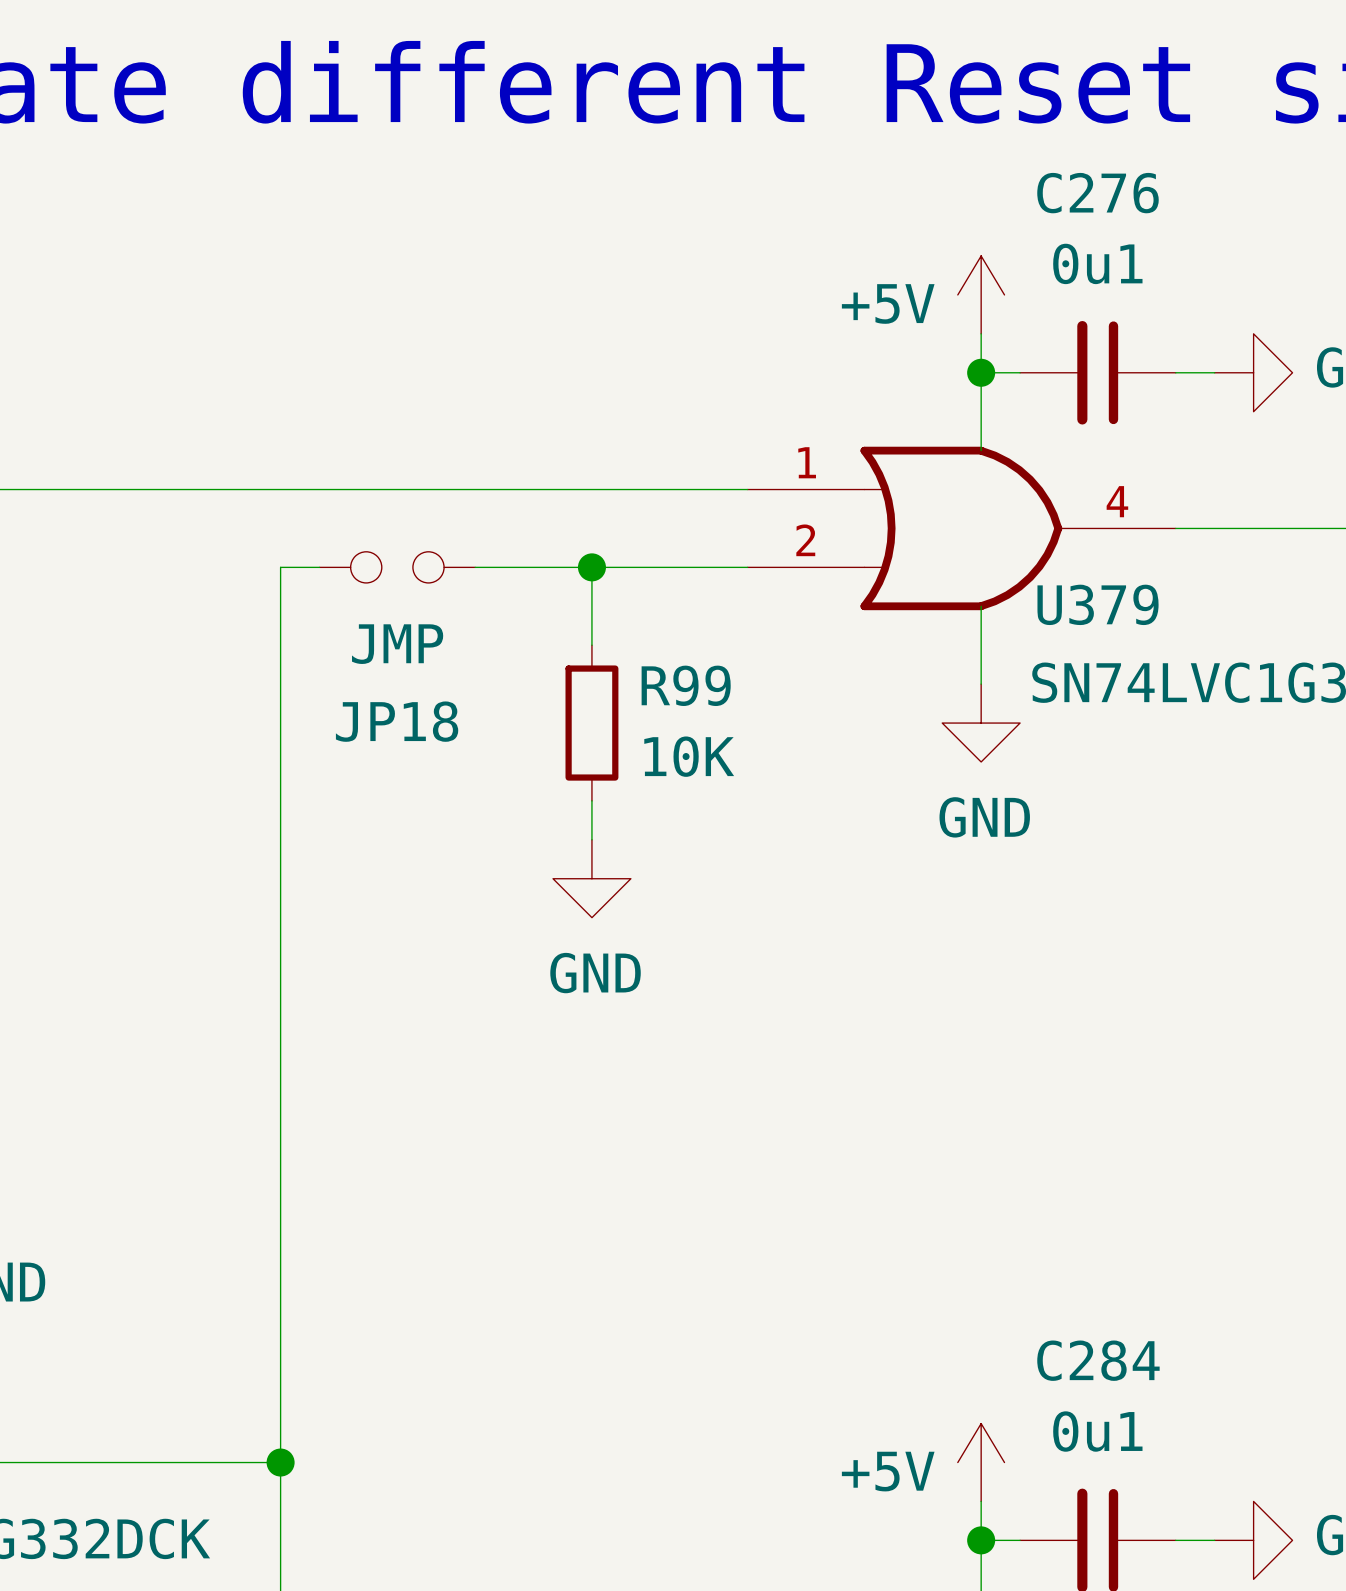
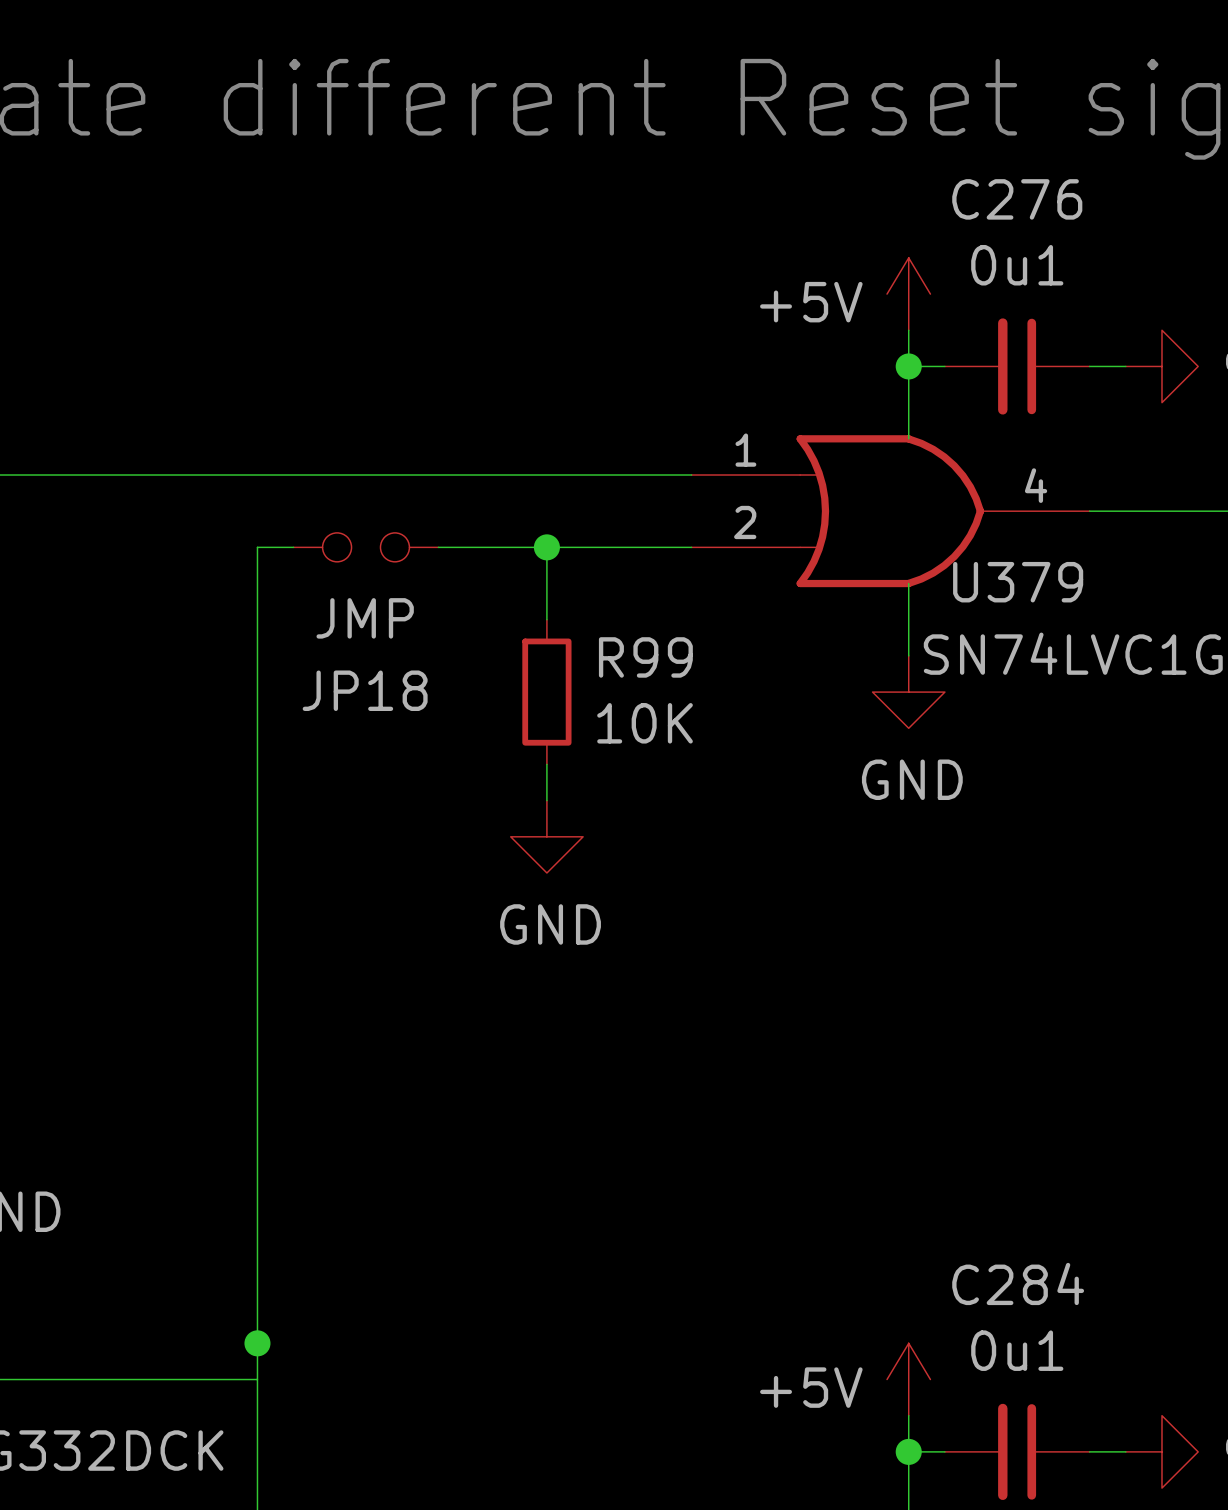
junction position: (280, 1462) -> (257, 1343)

